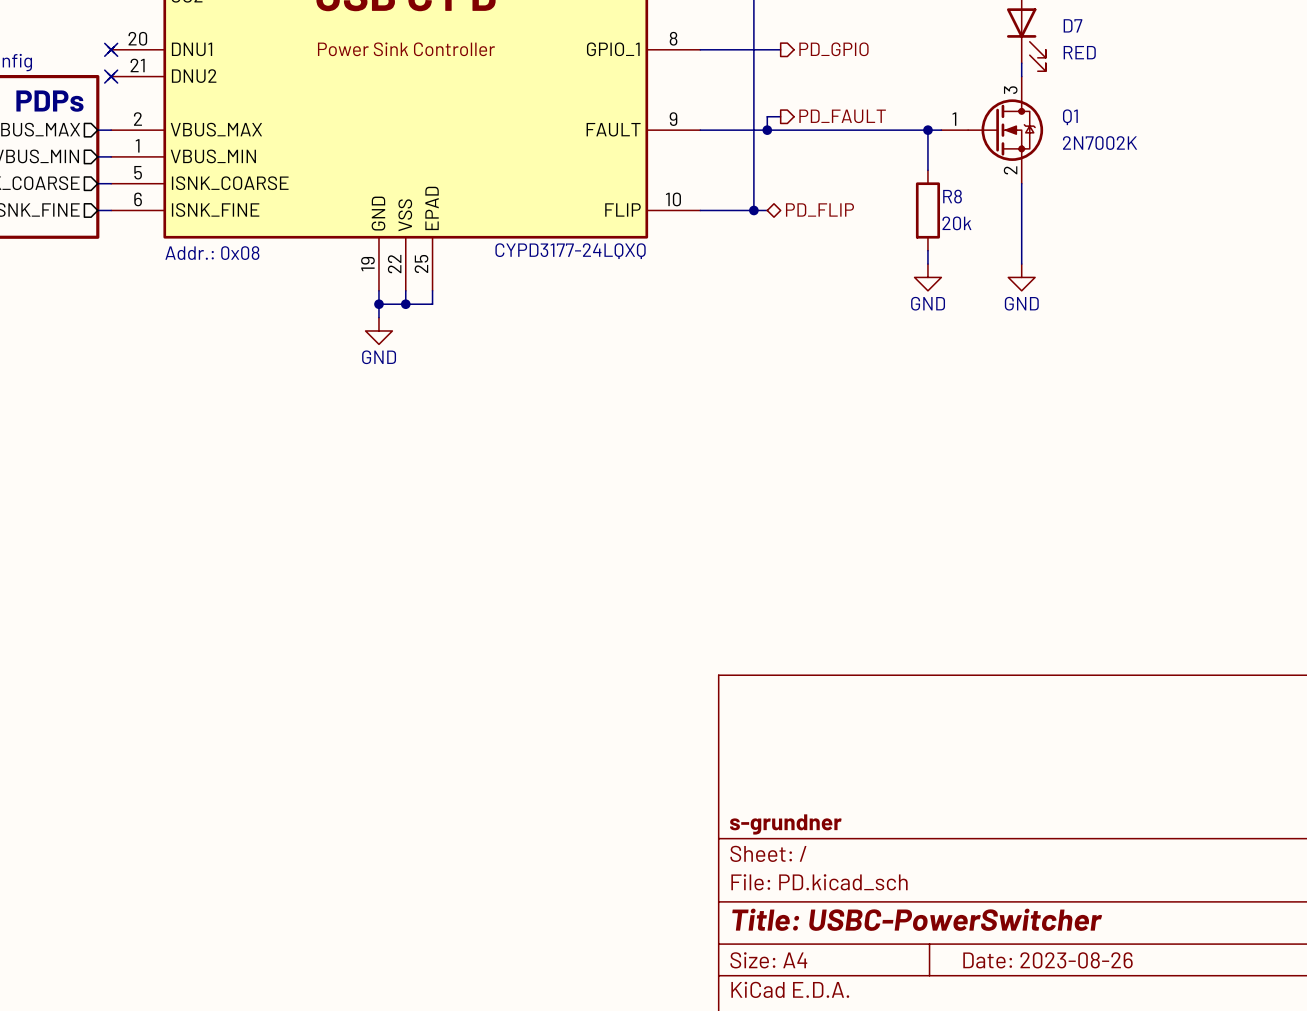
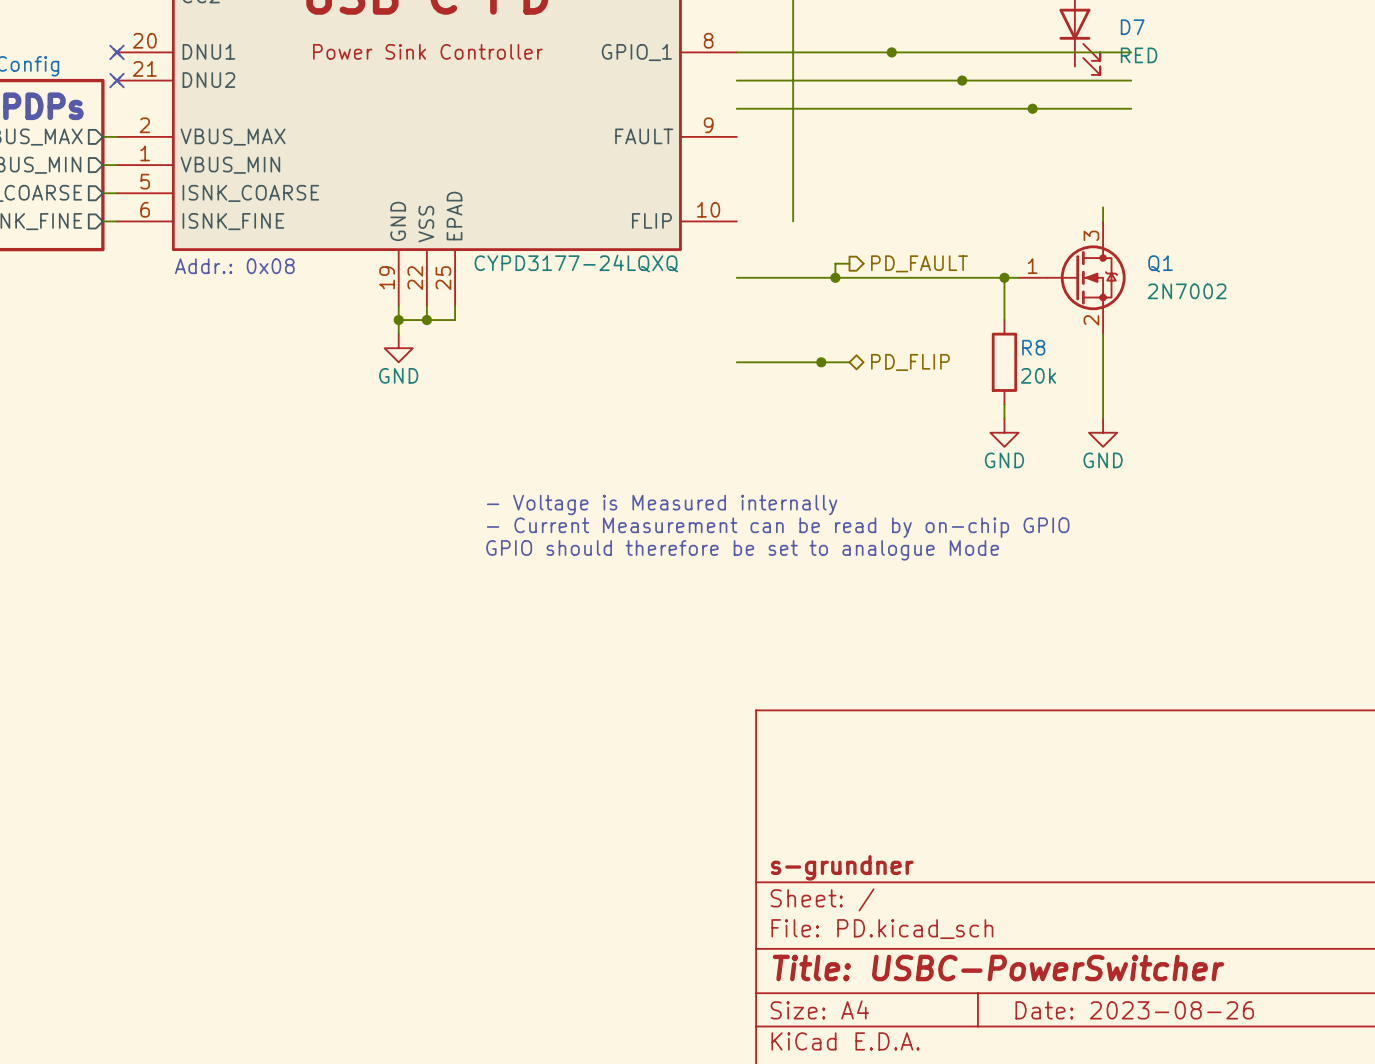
wire: none -> (821, 52) (1131, 52)
hierarchical label: PD_GPIO (833, 49) -> none
junction: none -> (891, 52)
wire: (1021, 63) (1021, 76) -> (1103, 207) (1103, 221)
wire: none -> (736, 80) (1131, 80)
junction: none -> (962, 80)
wire: none -> (736, 108) (1131, 108)
junction: none -> (1032, 108)
wire: (780, 116) (767, 116) (767, 130) -> (849, 263) (835, 263) (835, 277)
hierarchical label position: PD_FAULT (842, 116) -> PD_FAULT (919, 263)
wire: (700, 130) (941, 130) -> none
junction: (767, 130) -> none
wire: (927, 130) (927, 170) -> (1004, 277) (1004, 320)
junction: (927, 130) -> none
Q1 position: (992, 130) -> (1072, 277)
Q1 value: 2N7002K (1100, 143) -> 2N7002 (1187, 291)
wire: (1021, 183) (1021, 264) -> (1103, 334) (1103, 418)
hierarchical label position: PD_FLIP (819, 209) -> PD_FLIP (910, 362)
wire: (700, 210) (767, 210) -> none
junction: (753, 210) -> none
R8 position: (927, 210) -> (1004, 362)
wire: (927, 250) (927, 264) -> (1004, 404) (1004, 418)
wire: none -> (736, 277) (1018, 277)
junction: none -> (835, 277)
junction: none -> (1004, 277)
power symbol: GND (927, 277) -> none
power symbol: GND (1021, 277) -> none
wire: none -> (736, 362) (849, 362)
junction: none -> (821, 362)
power symbol: none -> GND (1004, 432)
power symbol: none -> GND (1103, 432)
text: none -> - Voltage is Measured internally (662, 504)
text: none -> - Current Measurement can be read by on-chip GPIO (778, 527)
text: none -> GPIO should therefore be set to analogue Mode (742, 550)

